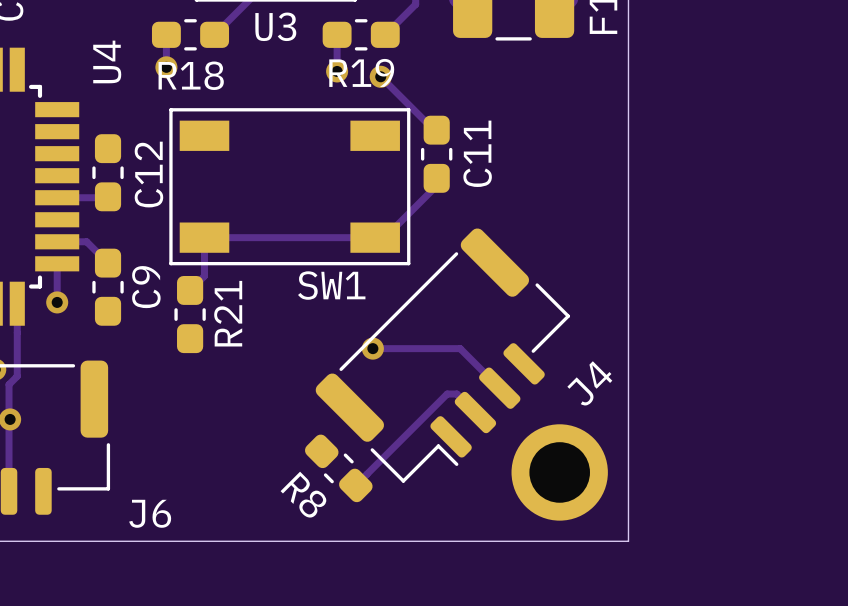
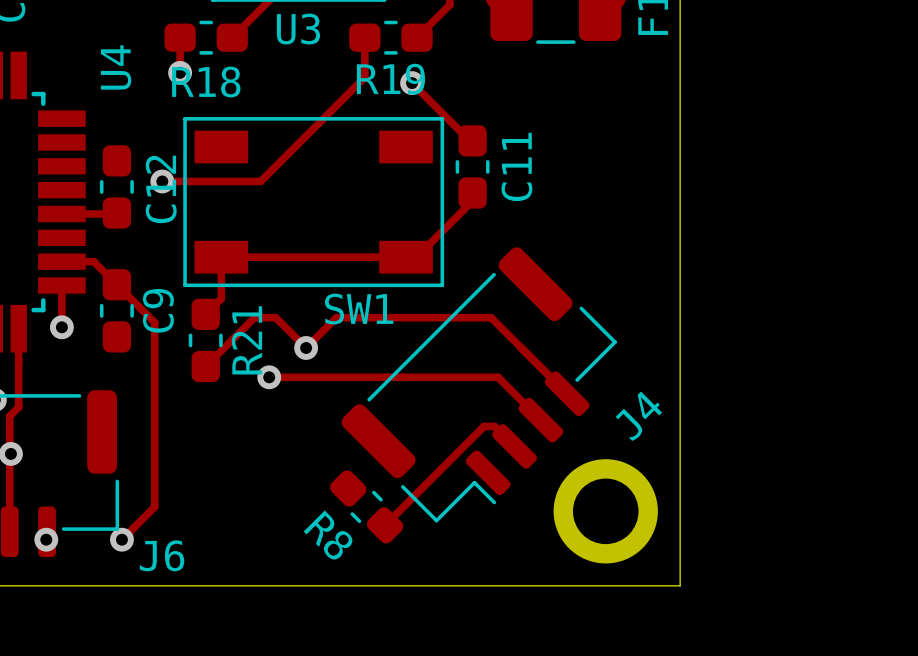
track: none -> (364, 77) (260, 181) (162, 181)
via: (337, 71) -> none
via: none -> (162, 181)
track: none -> (116, 284) (154, 322) (154, 506) (121, 539)
via: none -> (306, 347)
track: none -> (205, 366) (254, 317) (275, 317) (306, 347) (336, 317) (491, 317) (567, 393)
track: none -> (269, 377) (403, 377)
via: none -> (269, 377)
via: (372, 348) -> none
via: none -> (46, 539)
via: none -> (121, 539)

